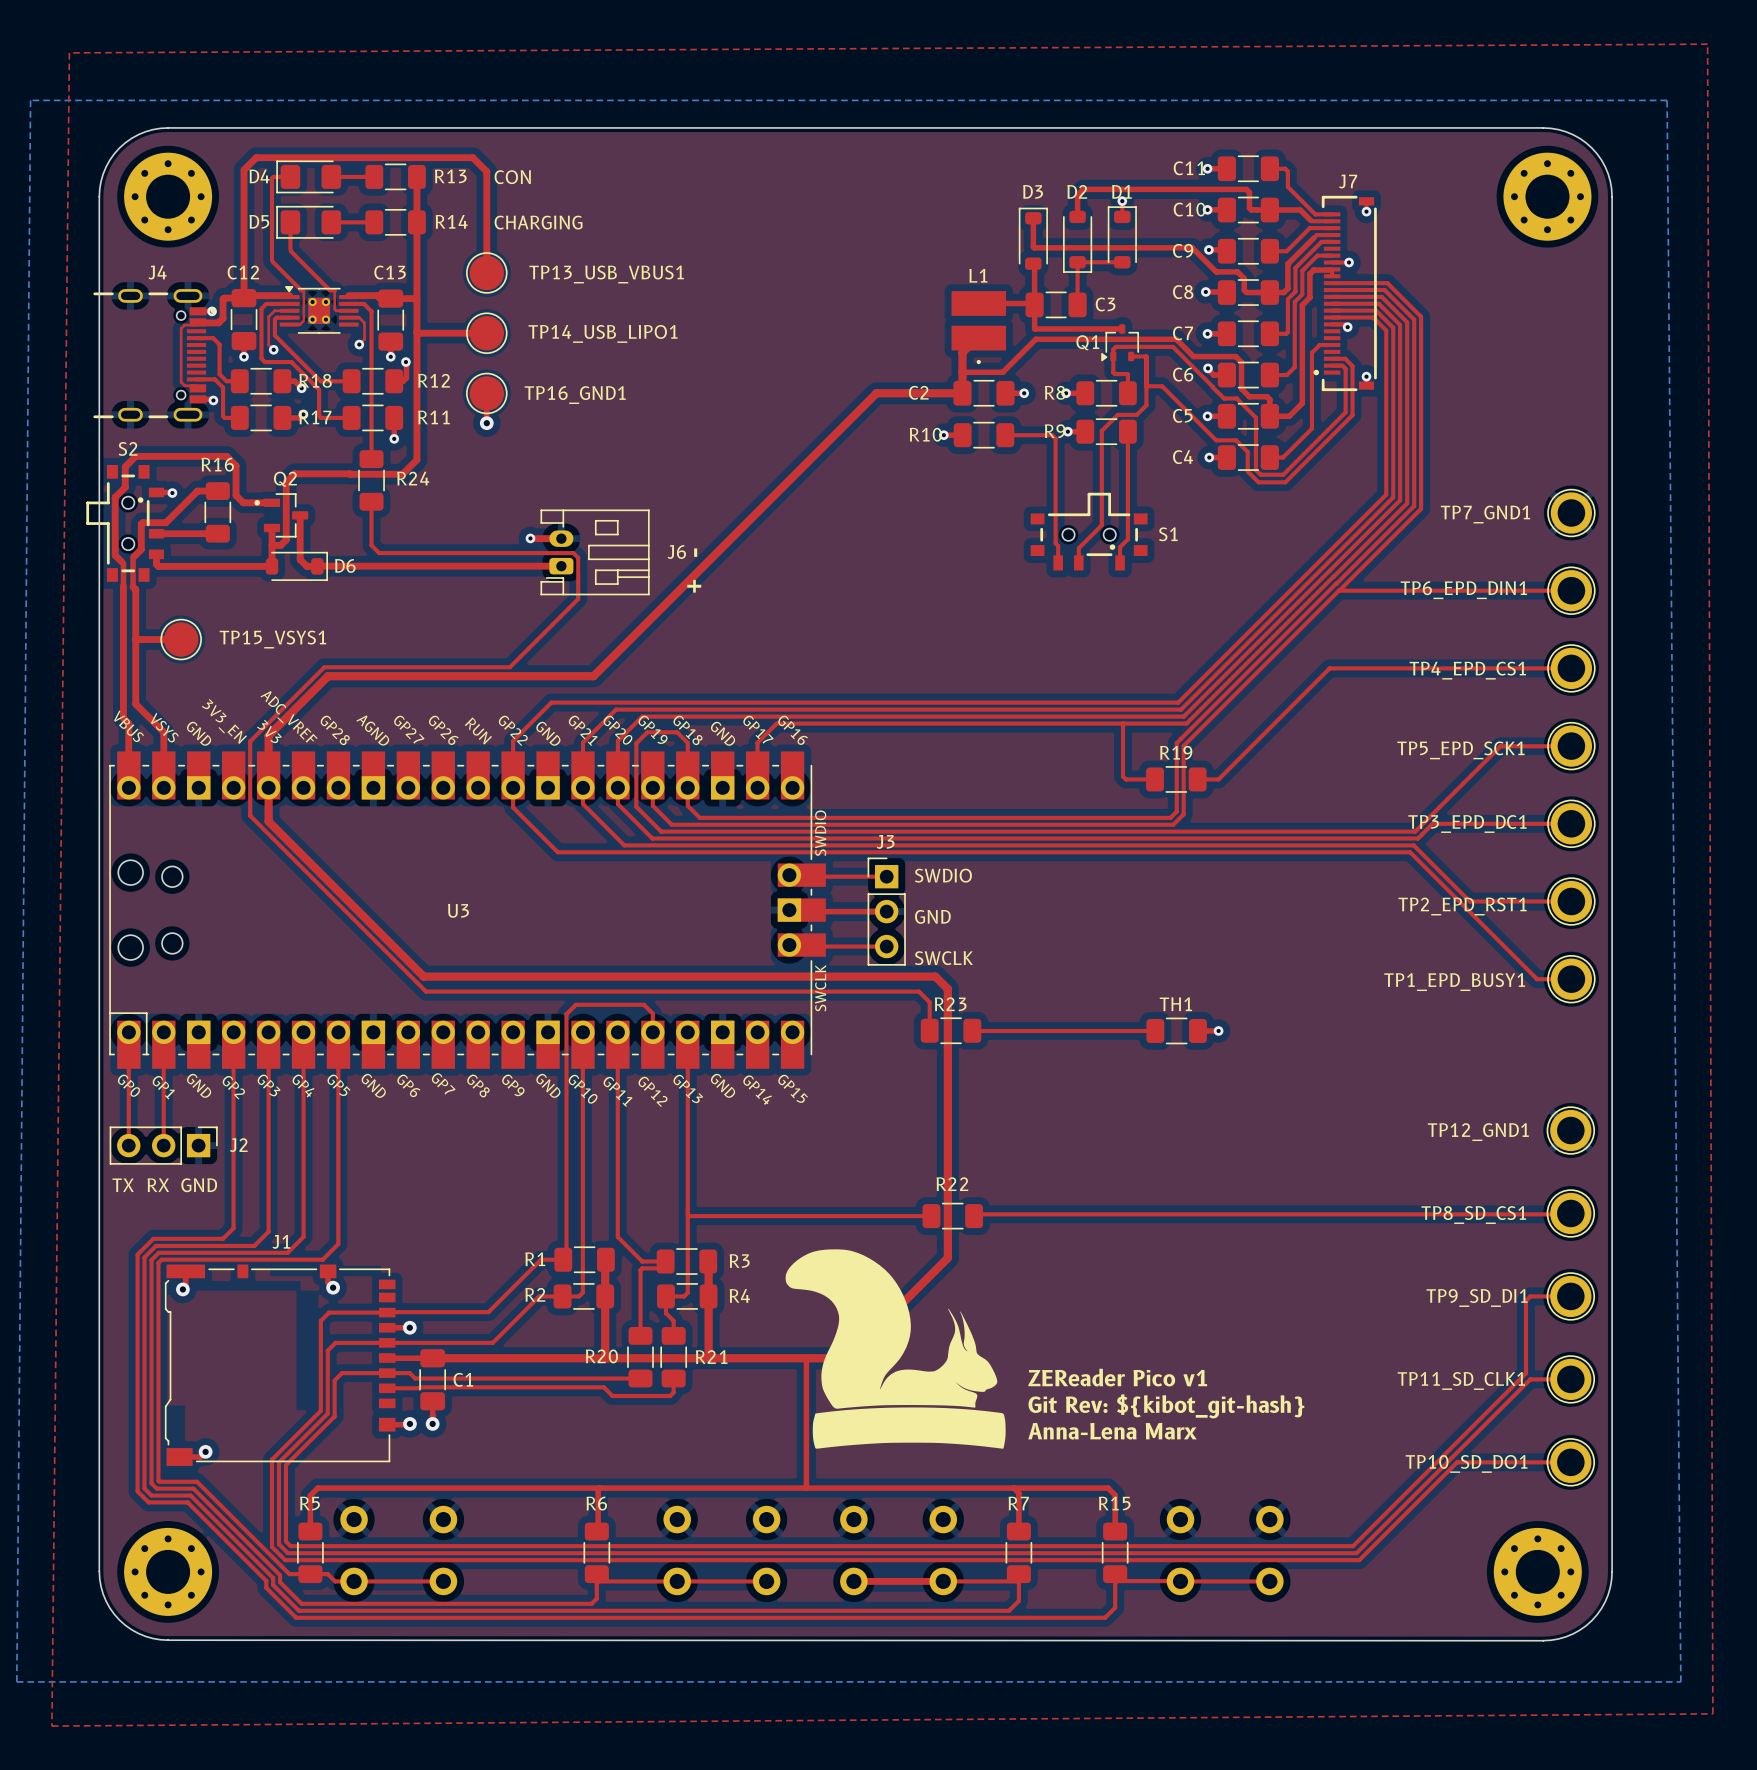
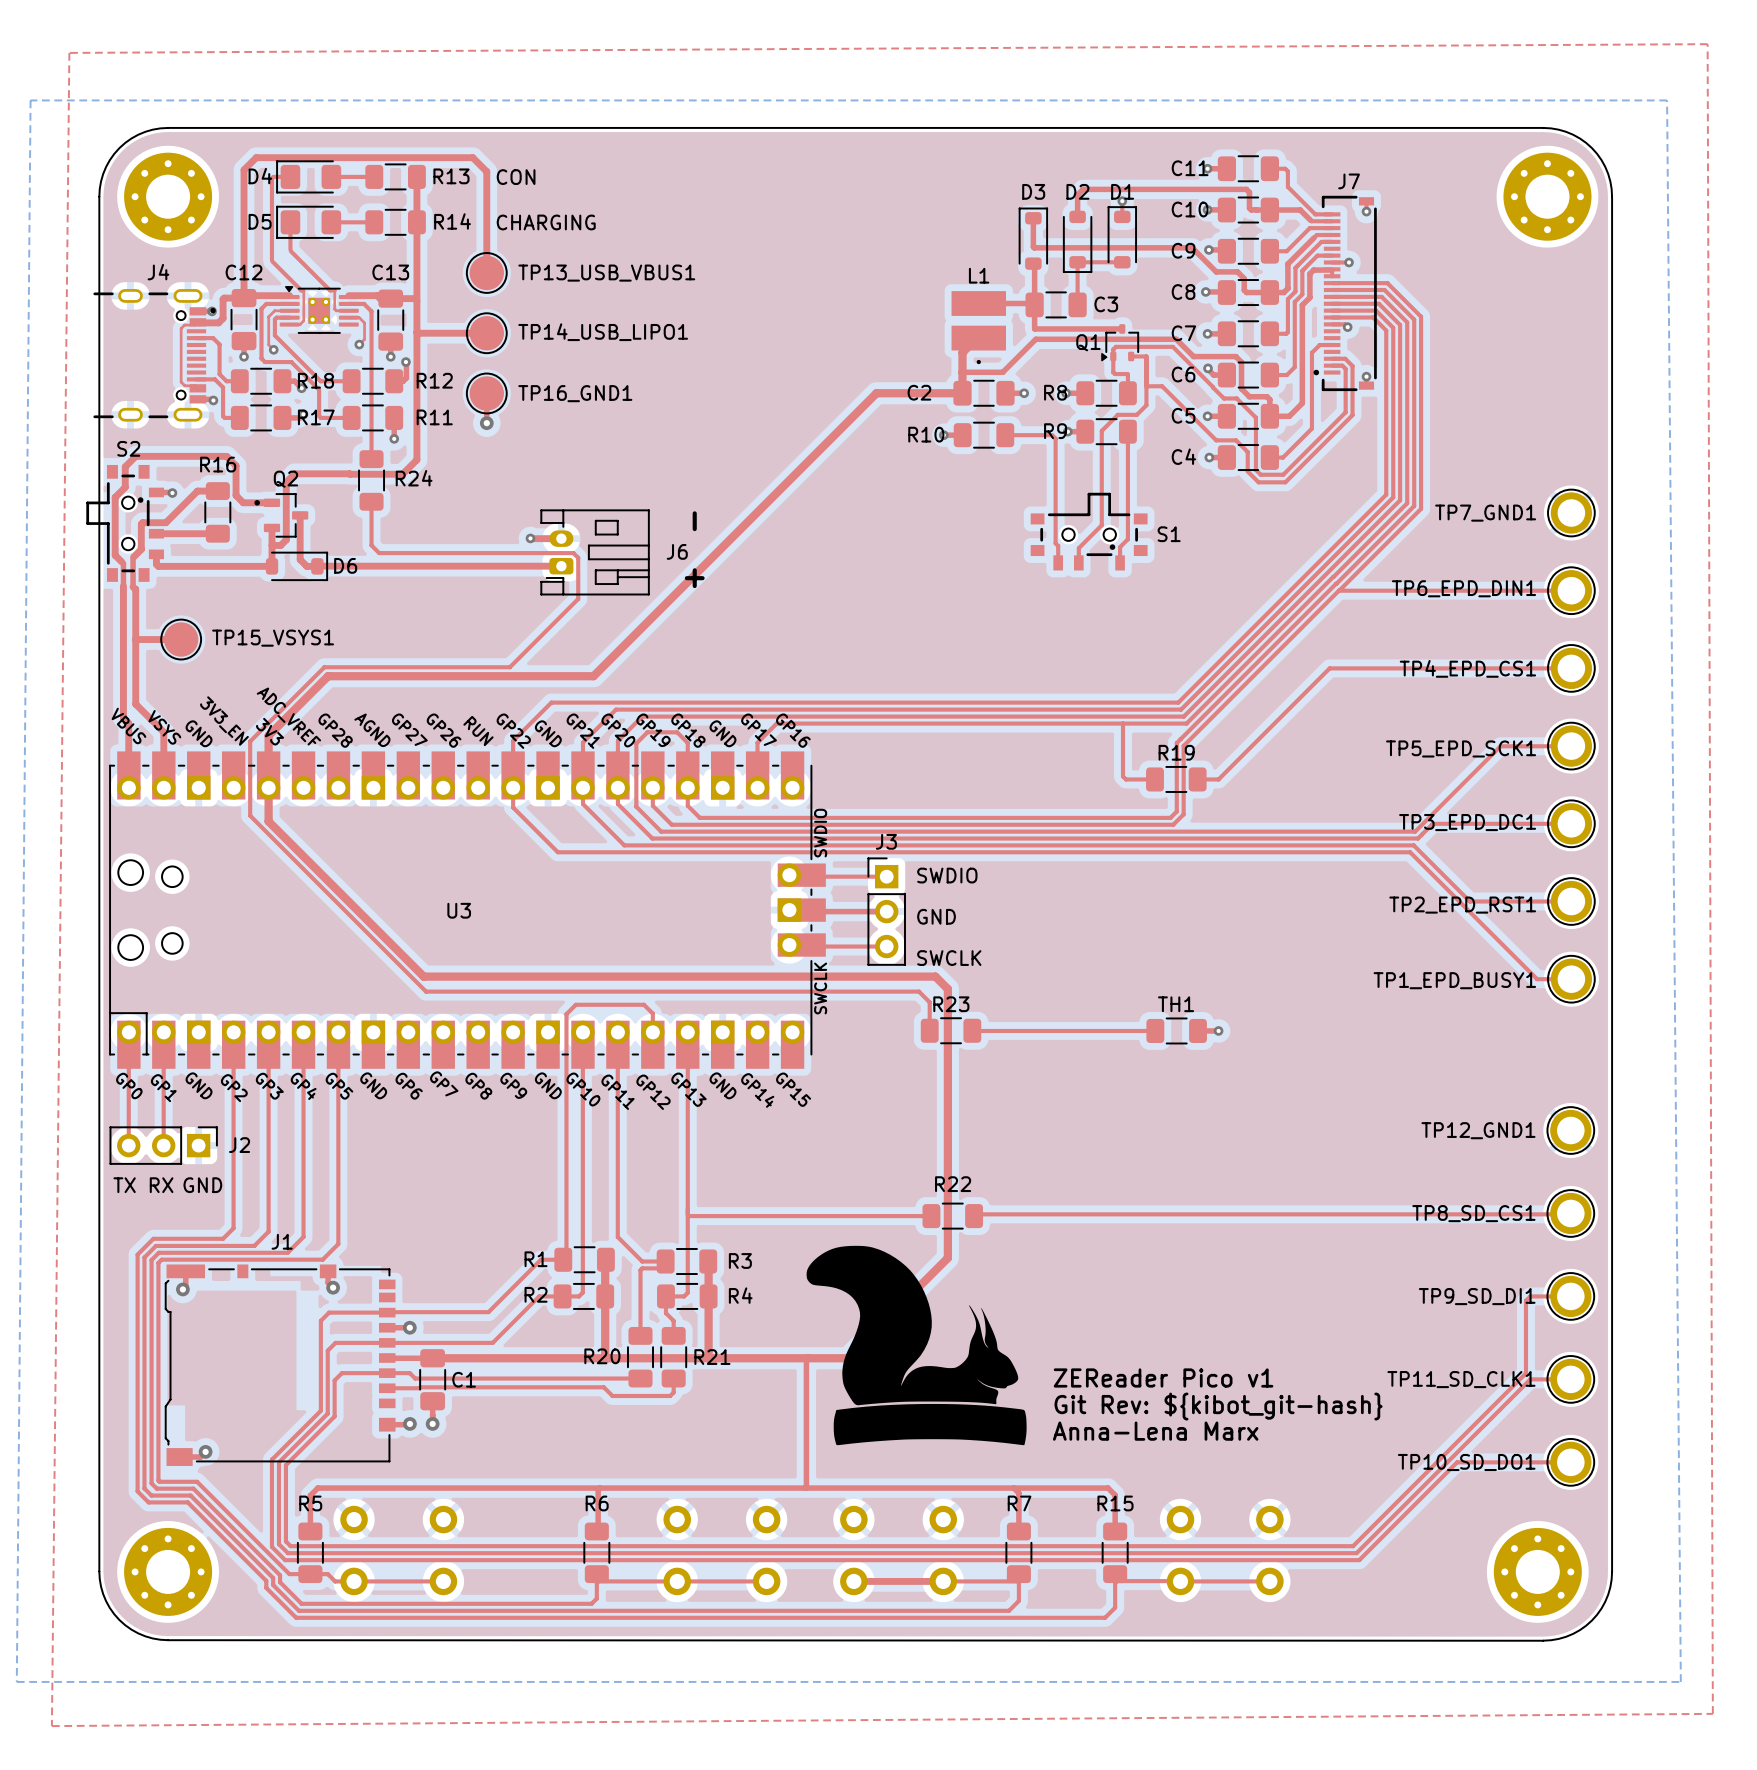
drawing position: (895, 1349) -> (916, 1345)
text position: ZEReader Pico v1 (1117, 1377) -> ZEReader Pico v1 (1163, 1377)
text position: Git Rev: ${kibot_git-hash} (1166, 1406) -> Git Rev: ${kibot_git-hash} (1218, 1406)
text position: Anna-Lena Marx (1112, 1431) -> Anna-Lena Marx (1155, 1431)

